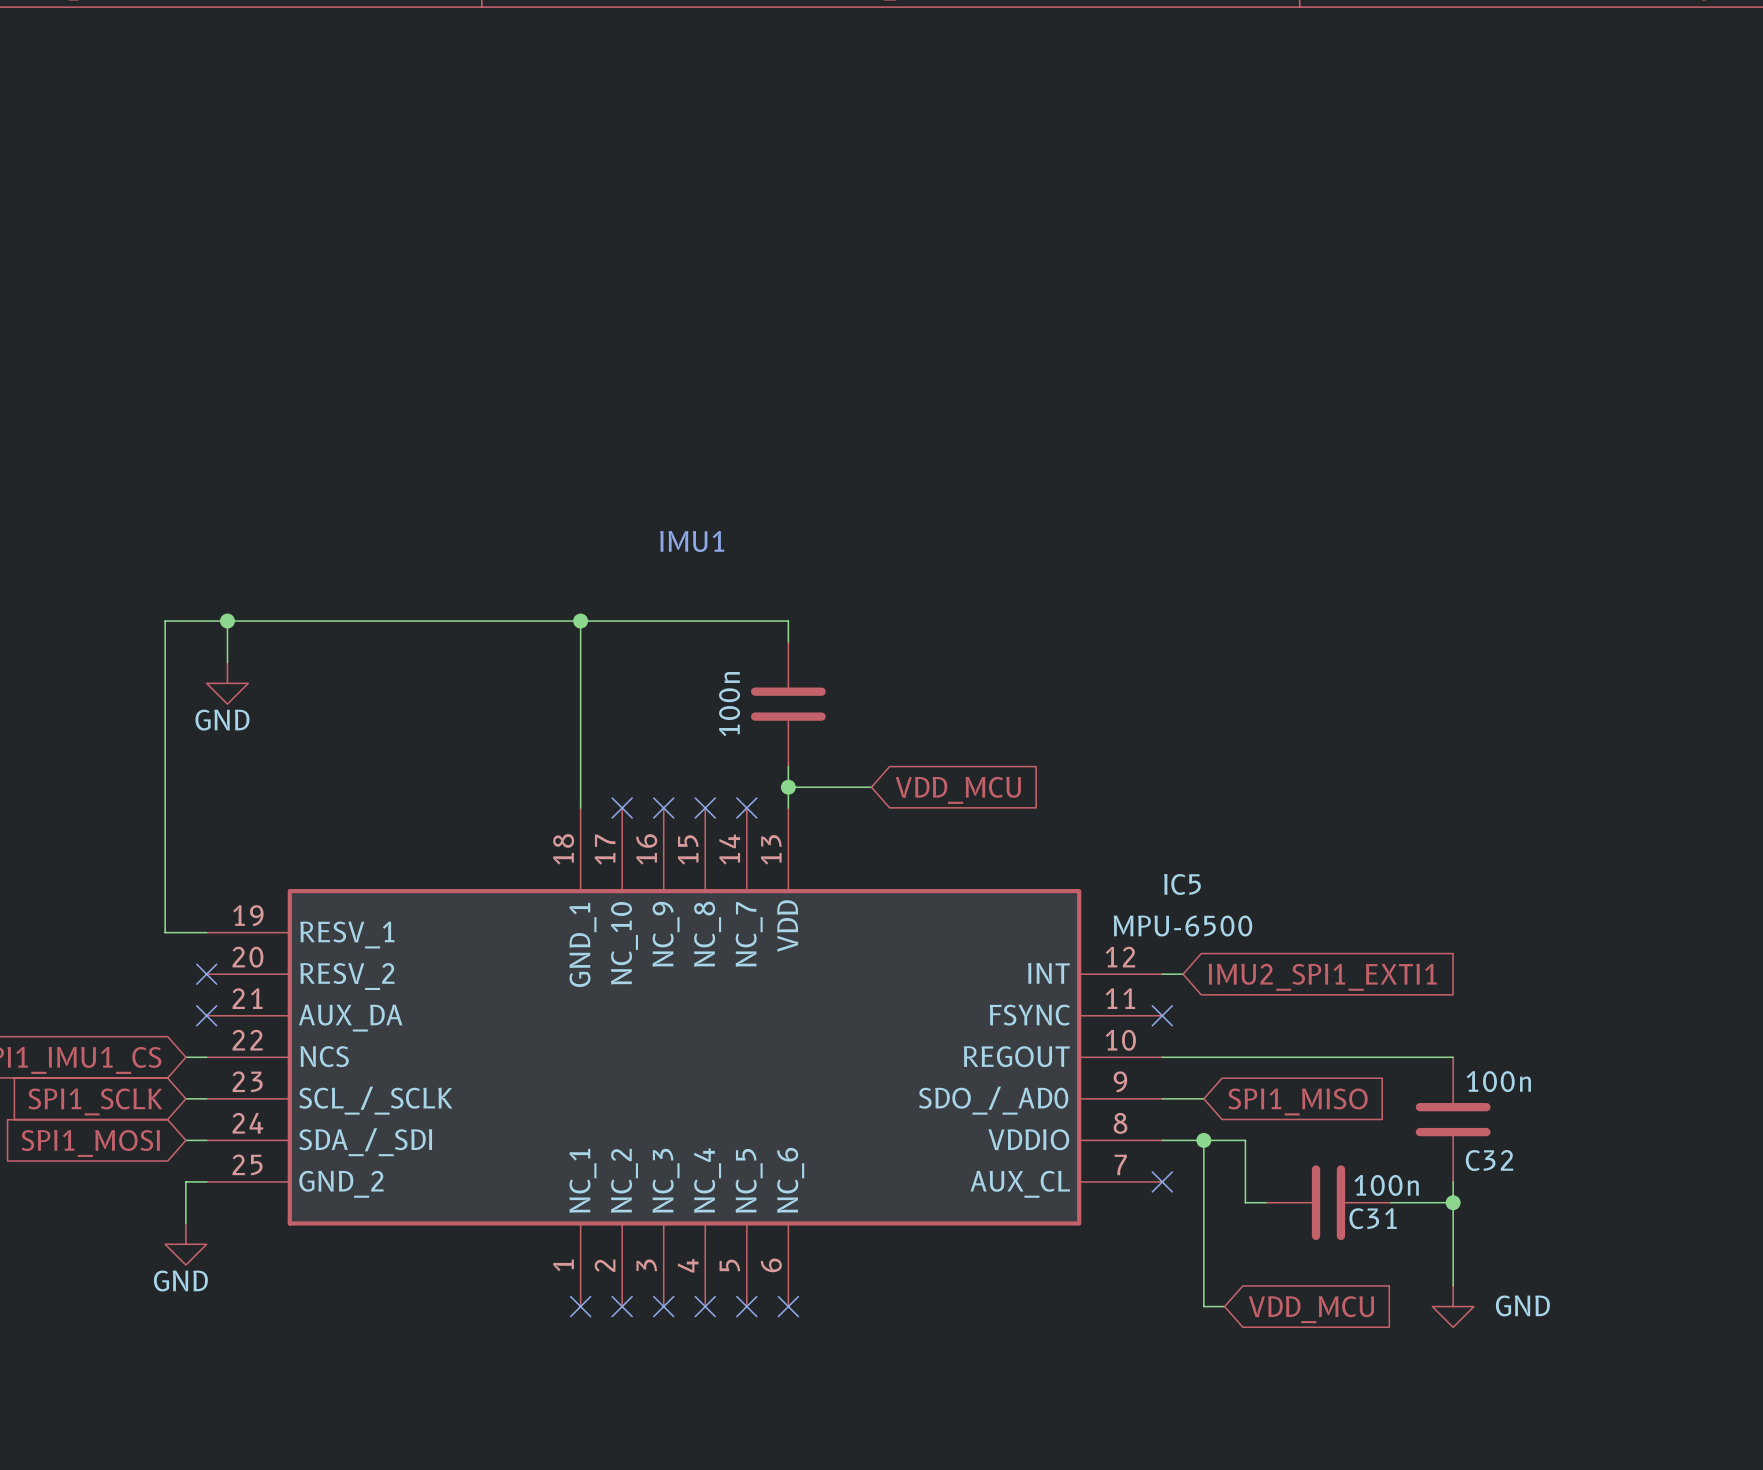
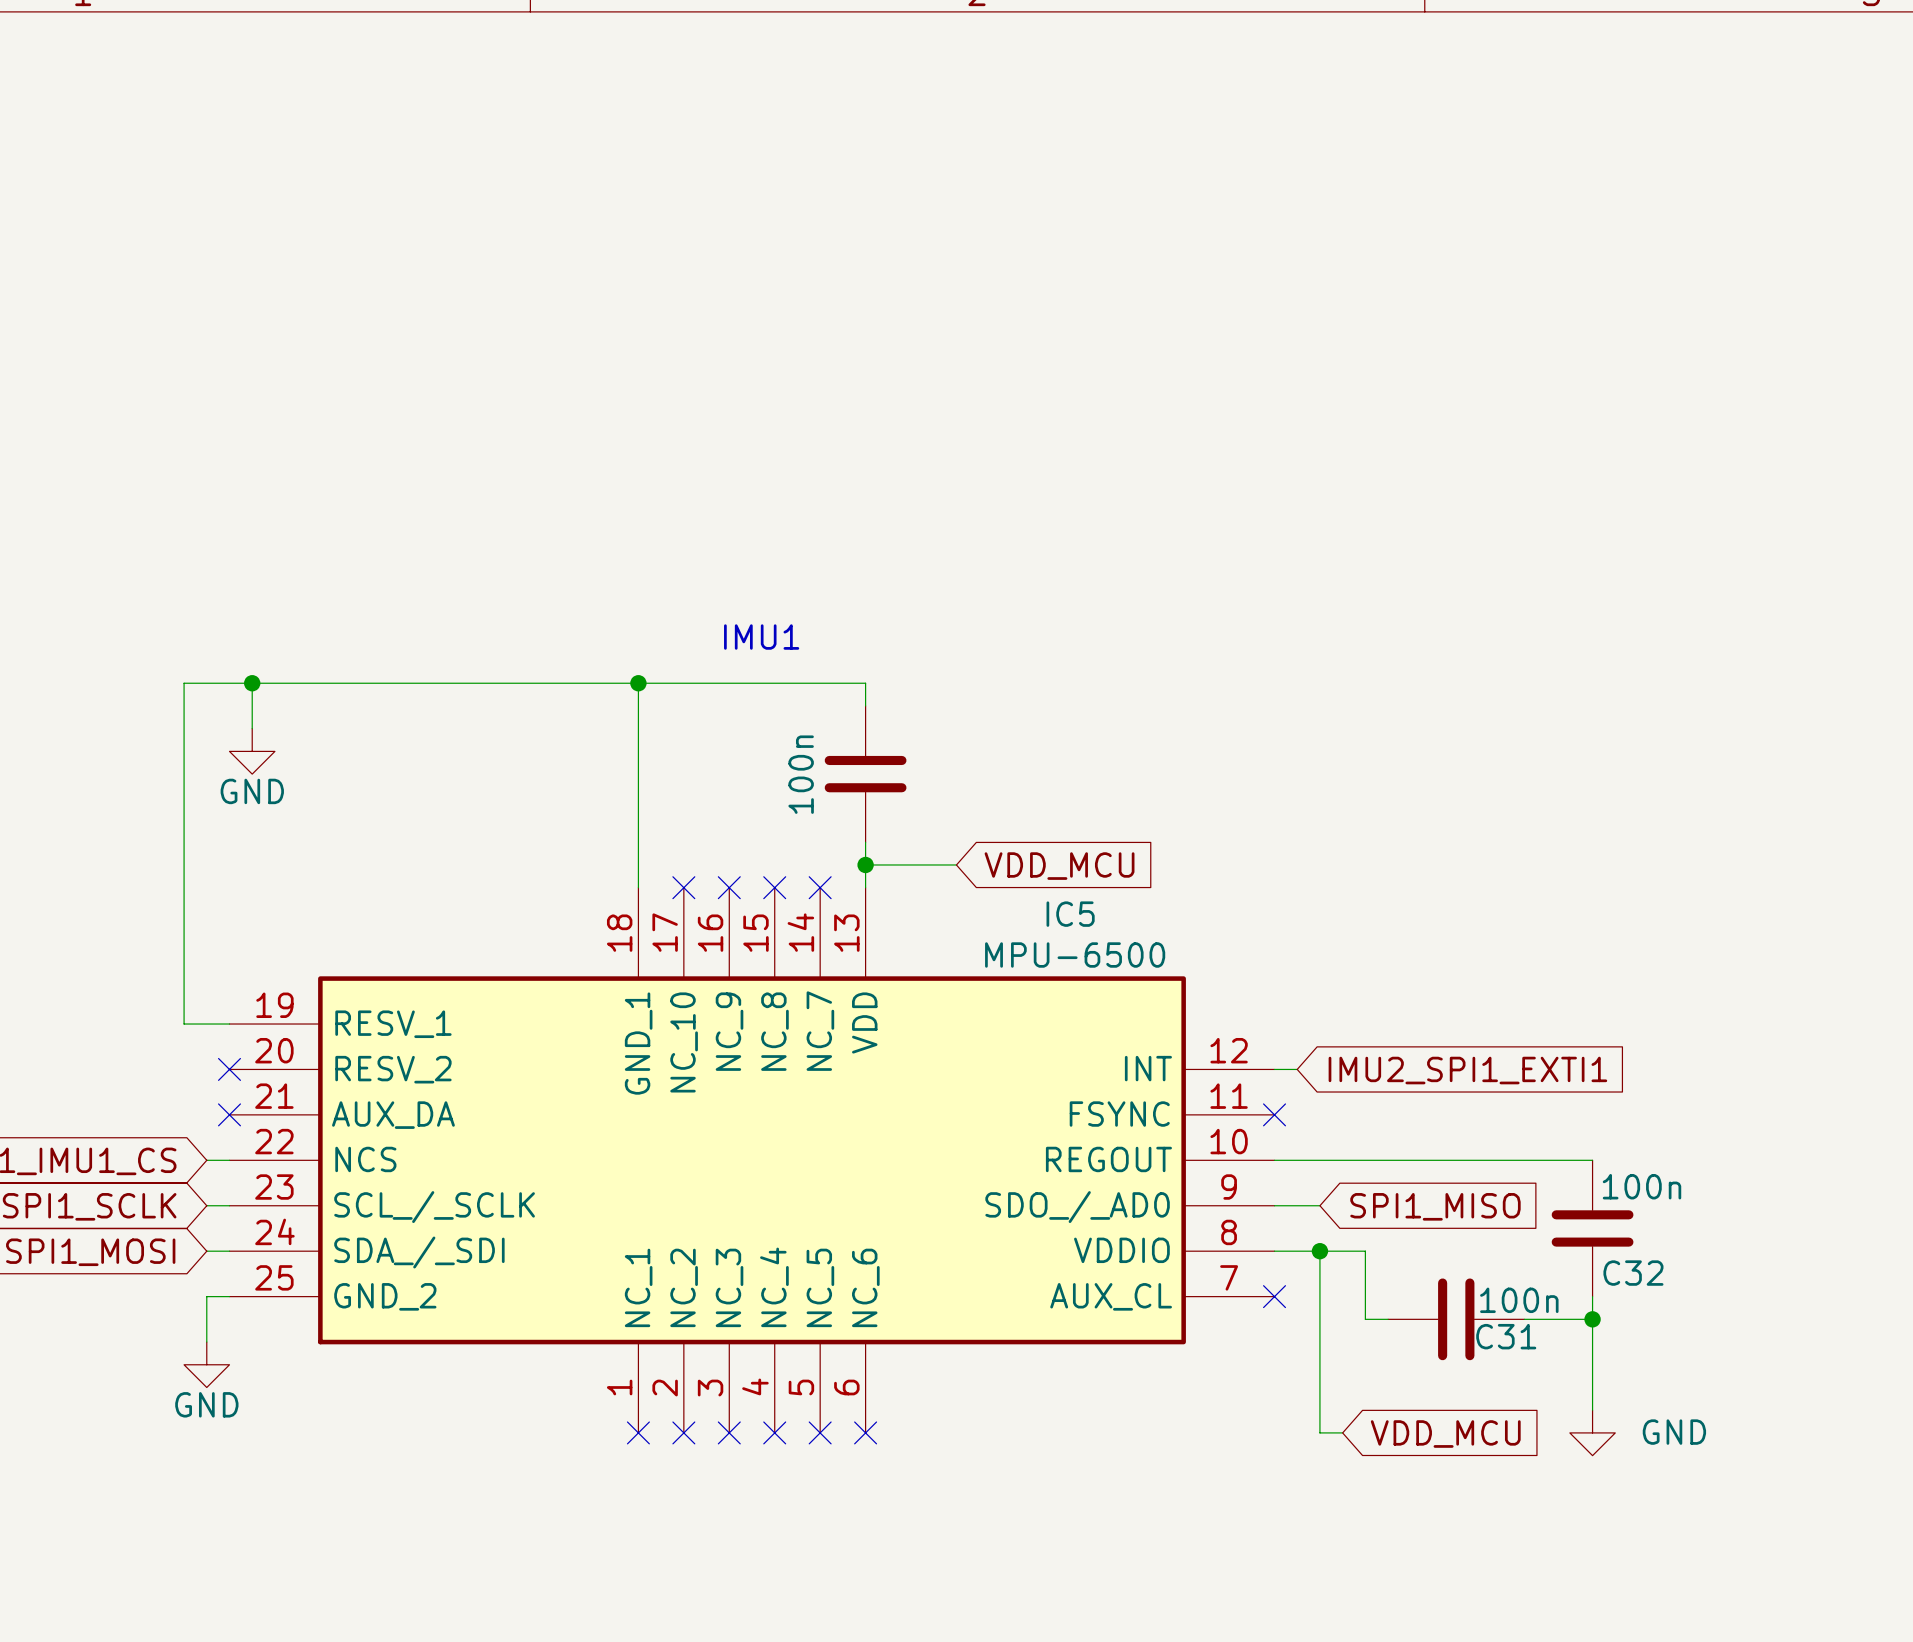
text position: IMU1 (692, 541) -> IMU1 (761, 637)
IC5 name position: IC5 (1182, 884) -> IC5 (1070, 914)
IC5 value position: MPU-6500 (1182, 926) -> MPU-6500 (1075, 955)

